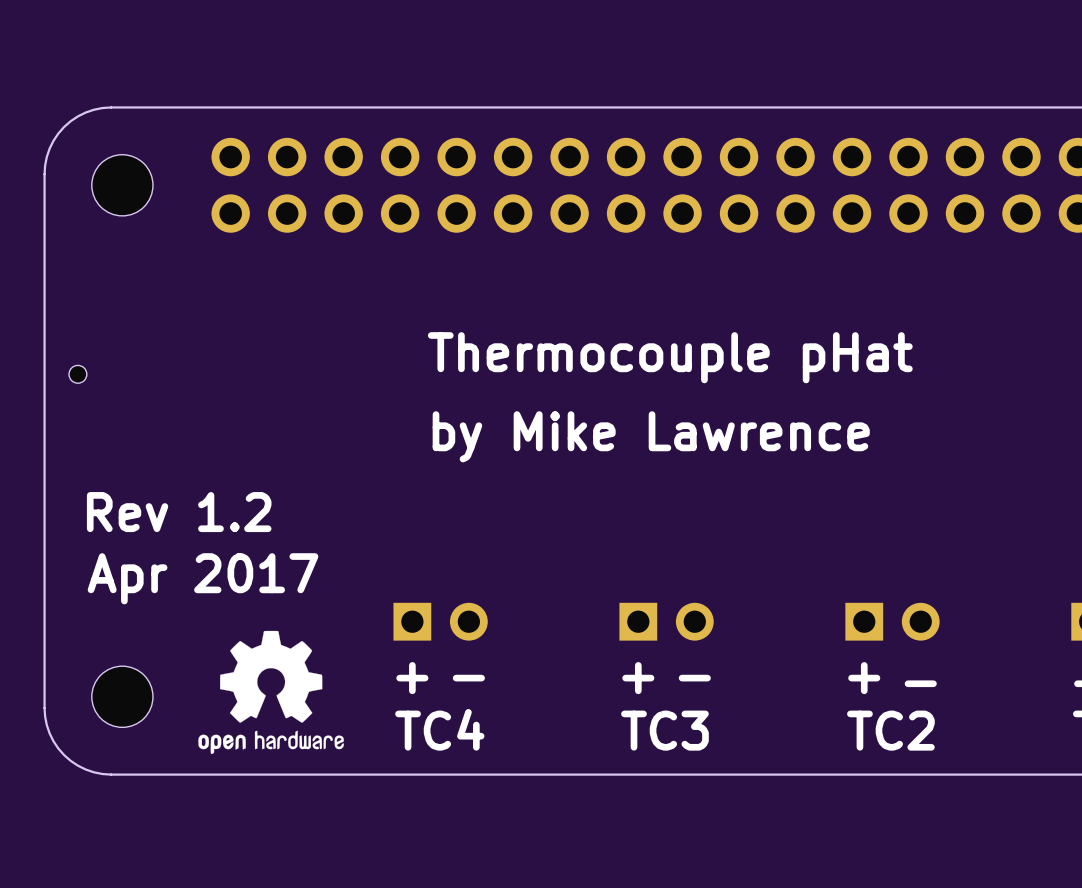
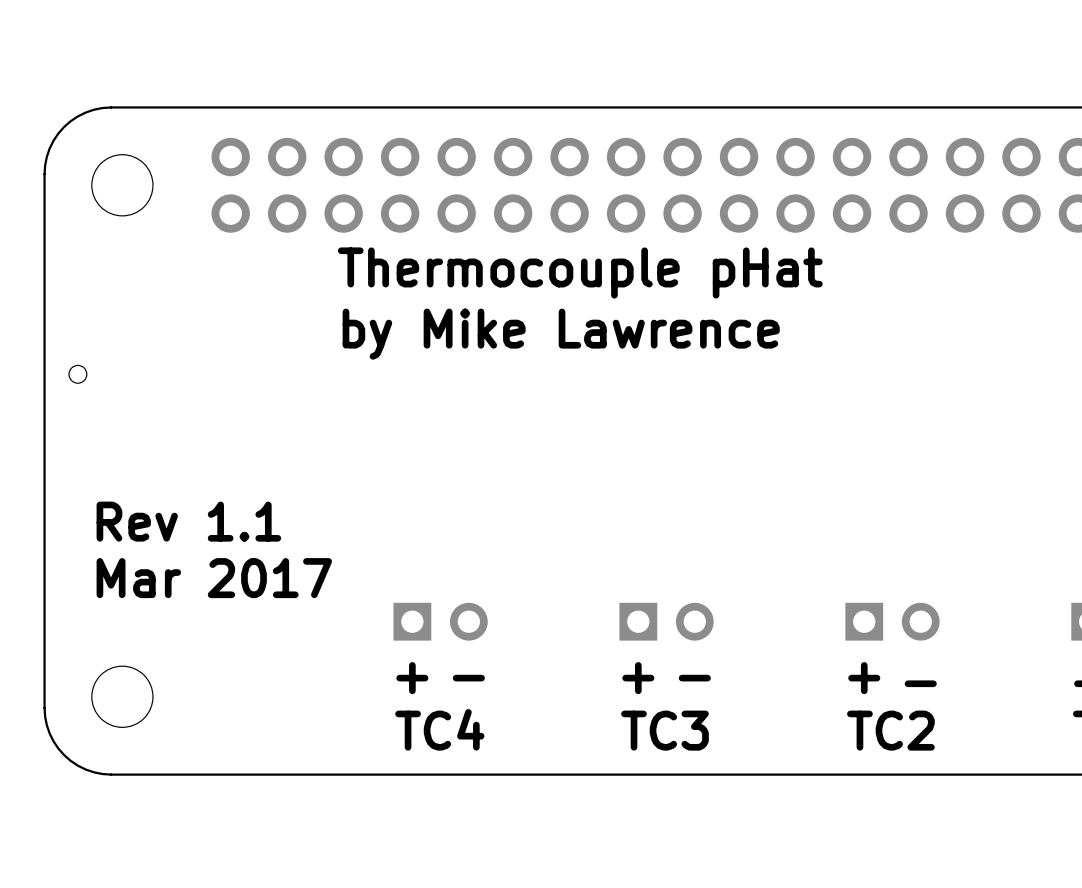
text position: Thermocouple pHat (670, 357) -> Thermocouple pHat (580, 272)
text position: by Mike Lawrence (651, 436) -> by Mike Lawrence (561, 334)
text: Rev 1.2 (179, 512) -> Rev 1.1 (188, 521)
text: Apr 2017 (203, 578) -> Mar 2017 (214, 578)
drawing: [198, 630, 344, 755] -> none

